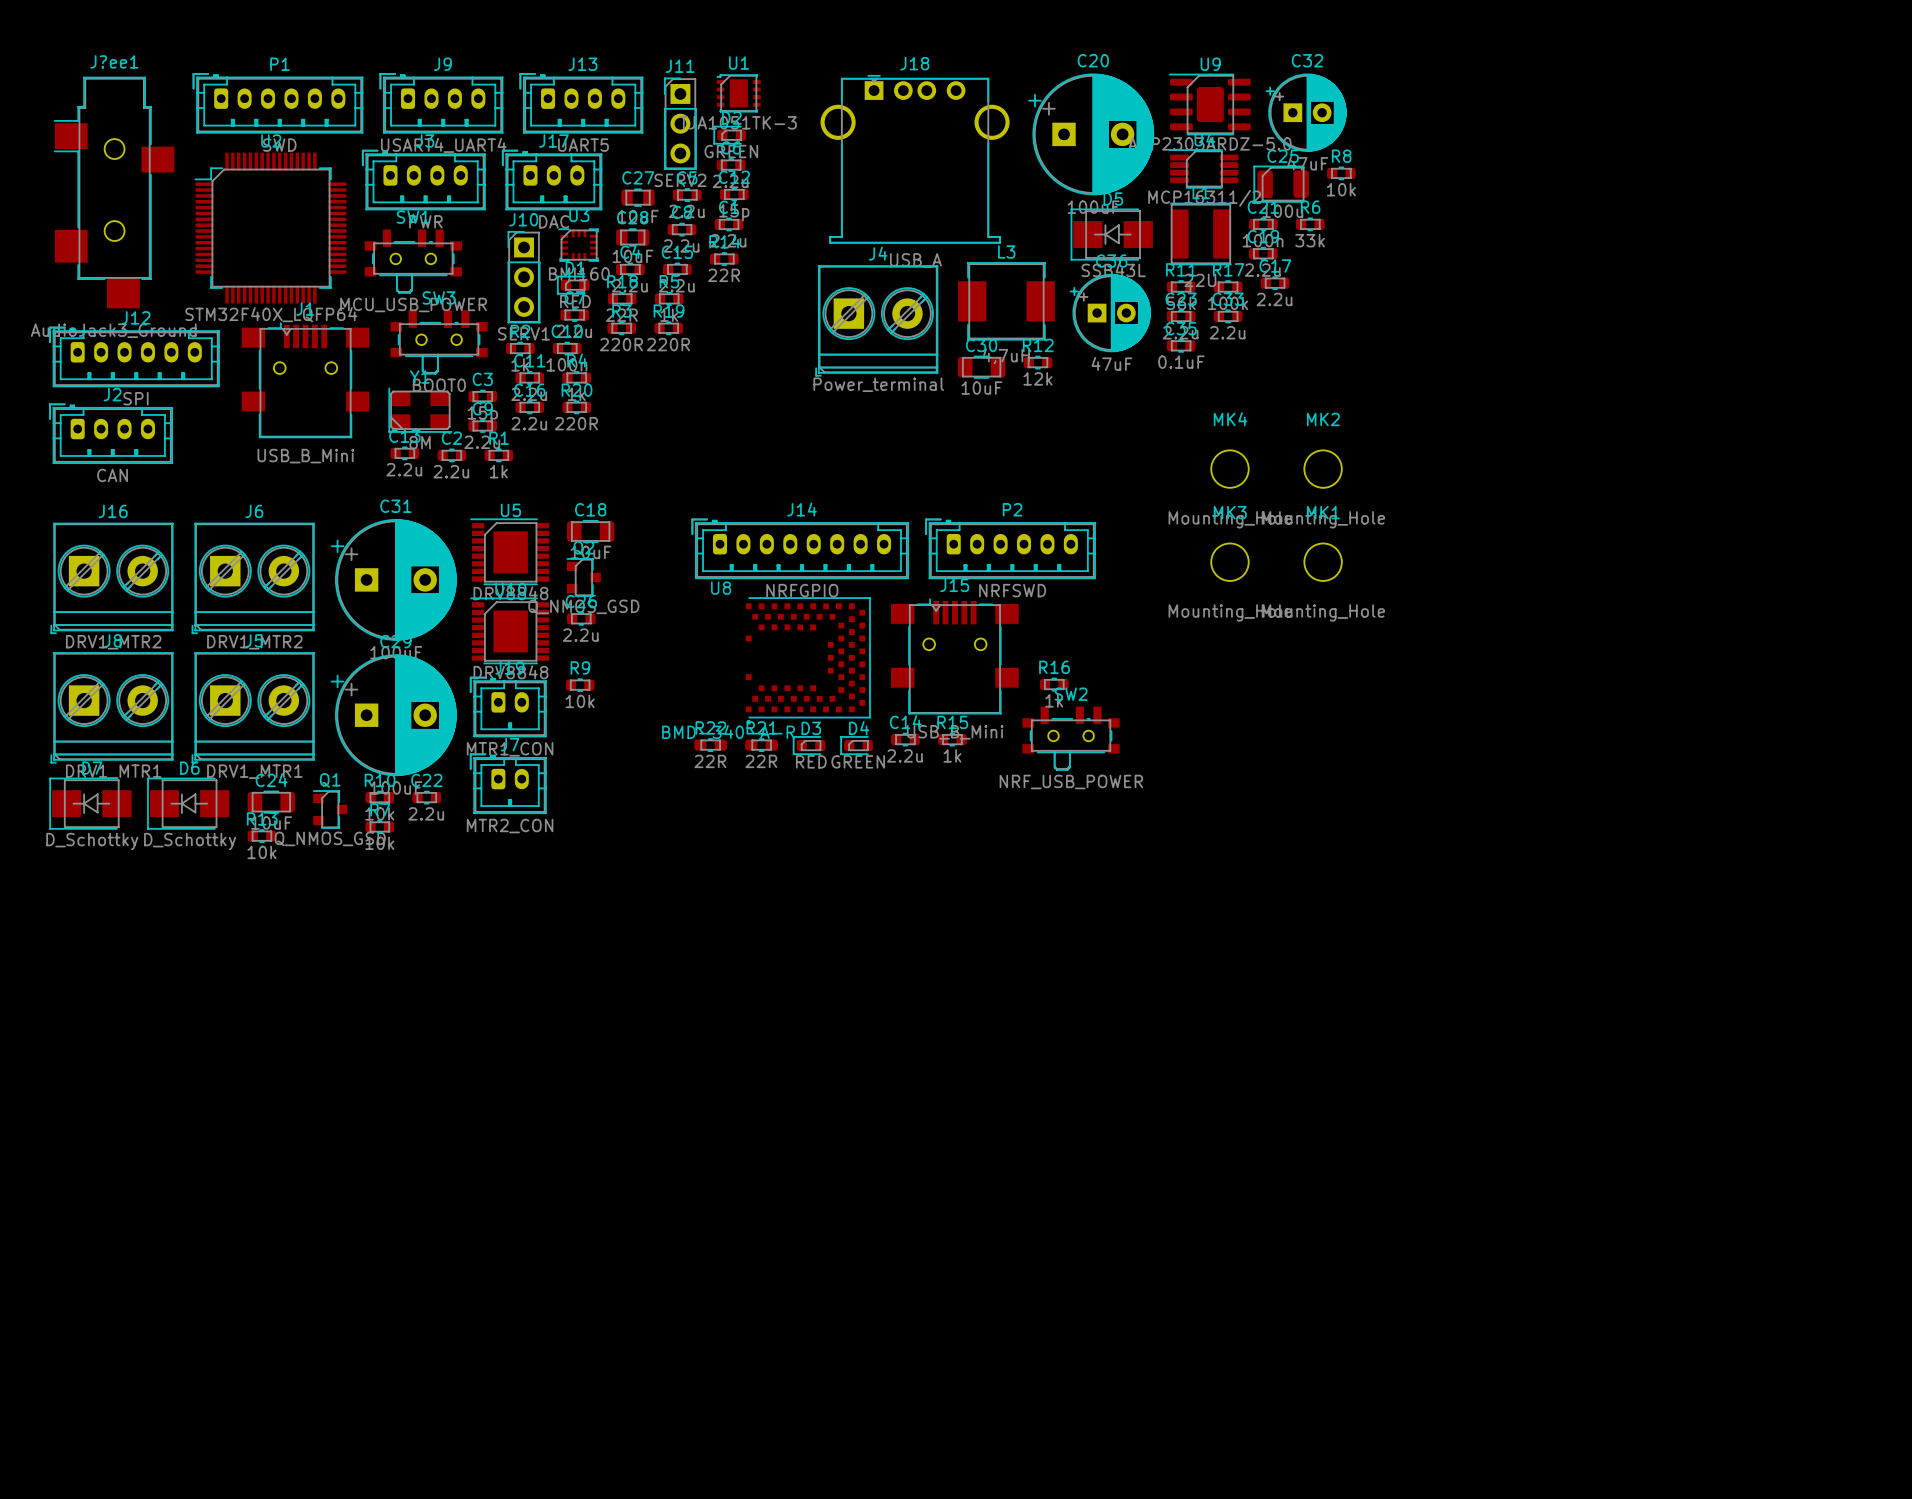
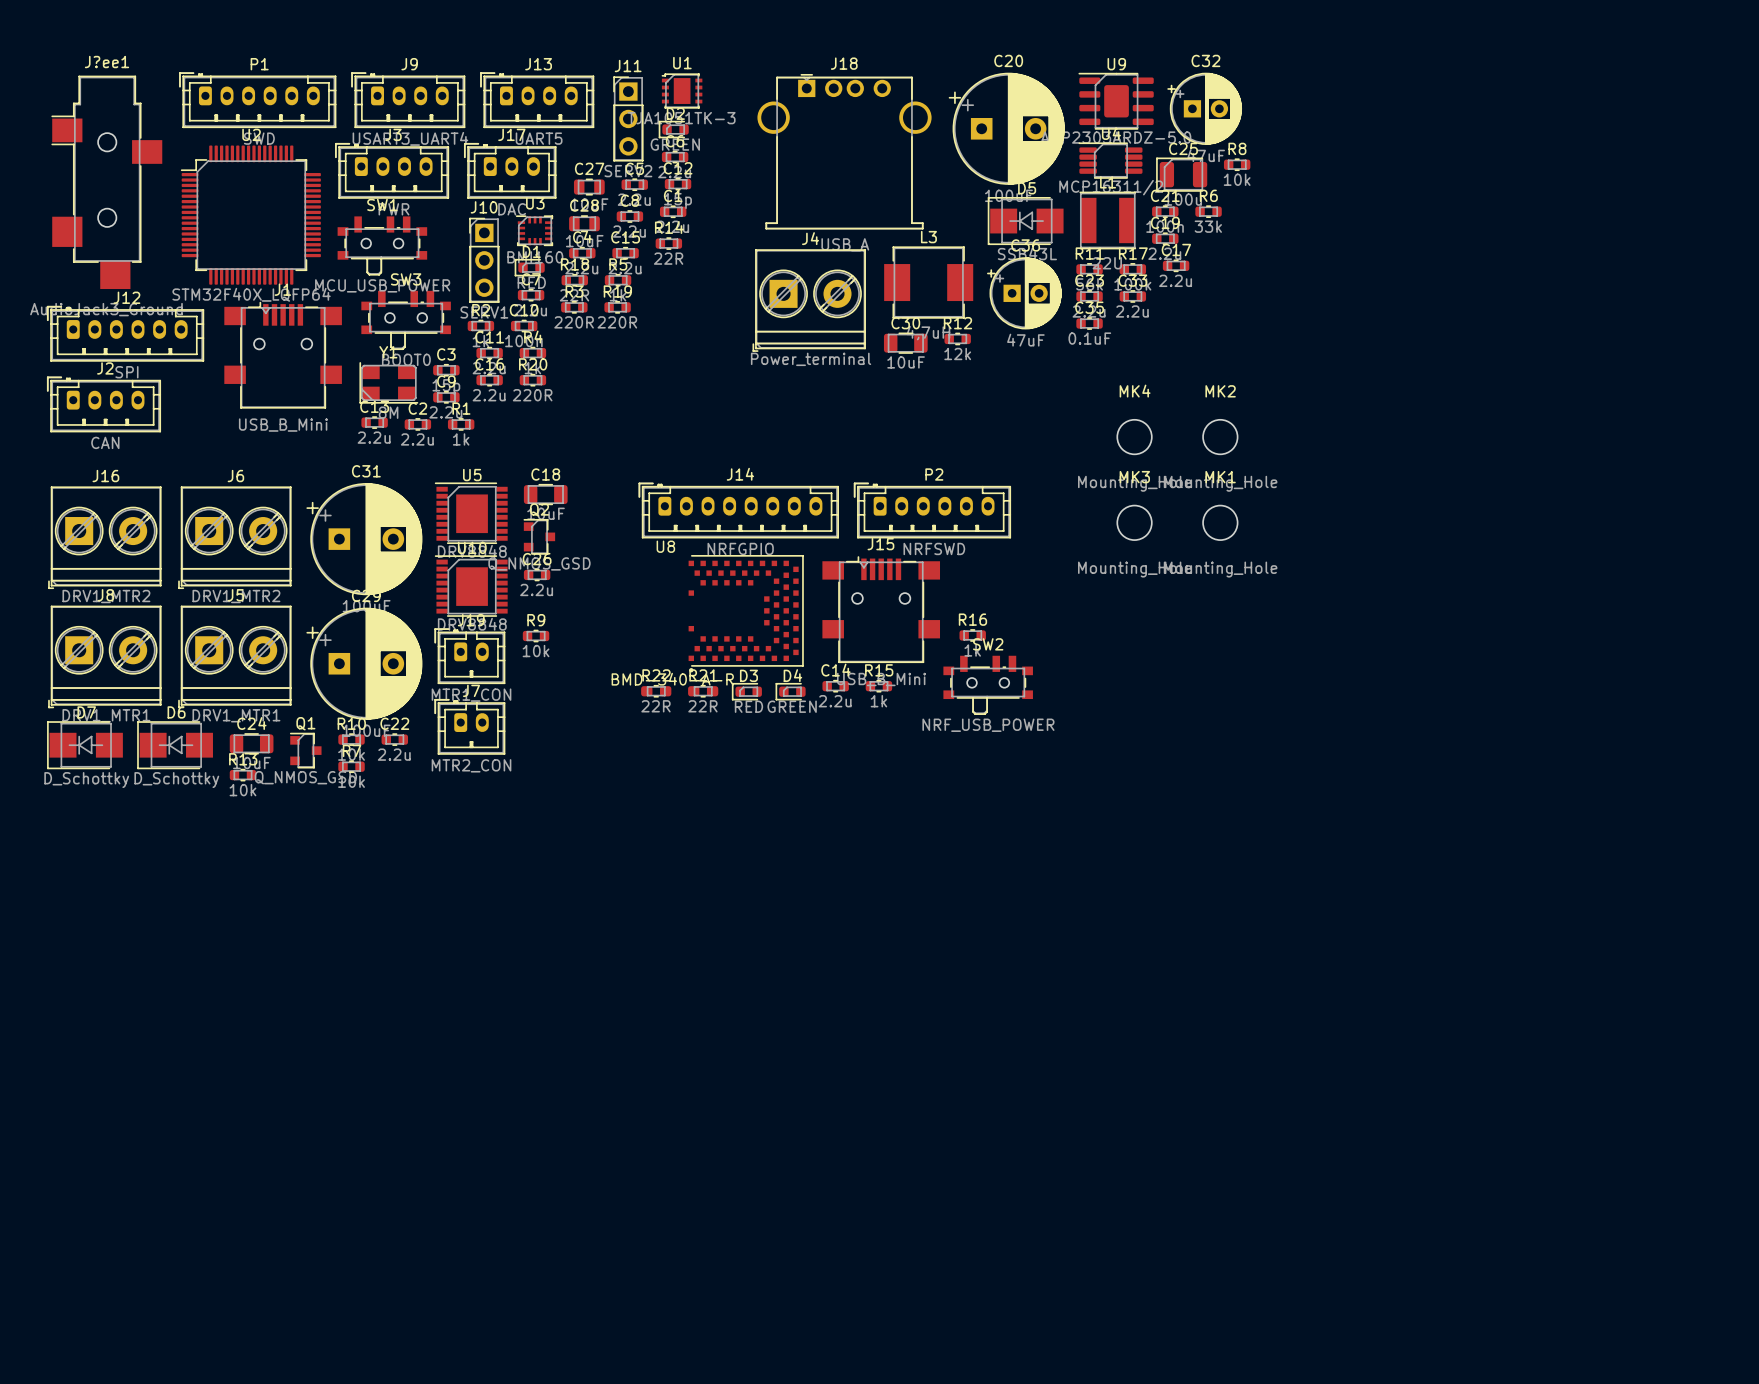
J9 value: USART4_UART4 (443, 145) -> USART3_UART4 (410, 138)

